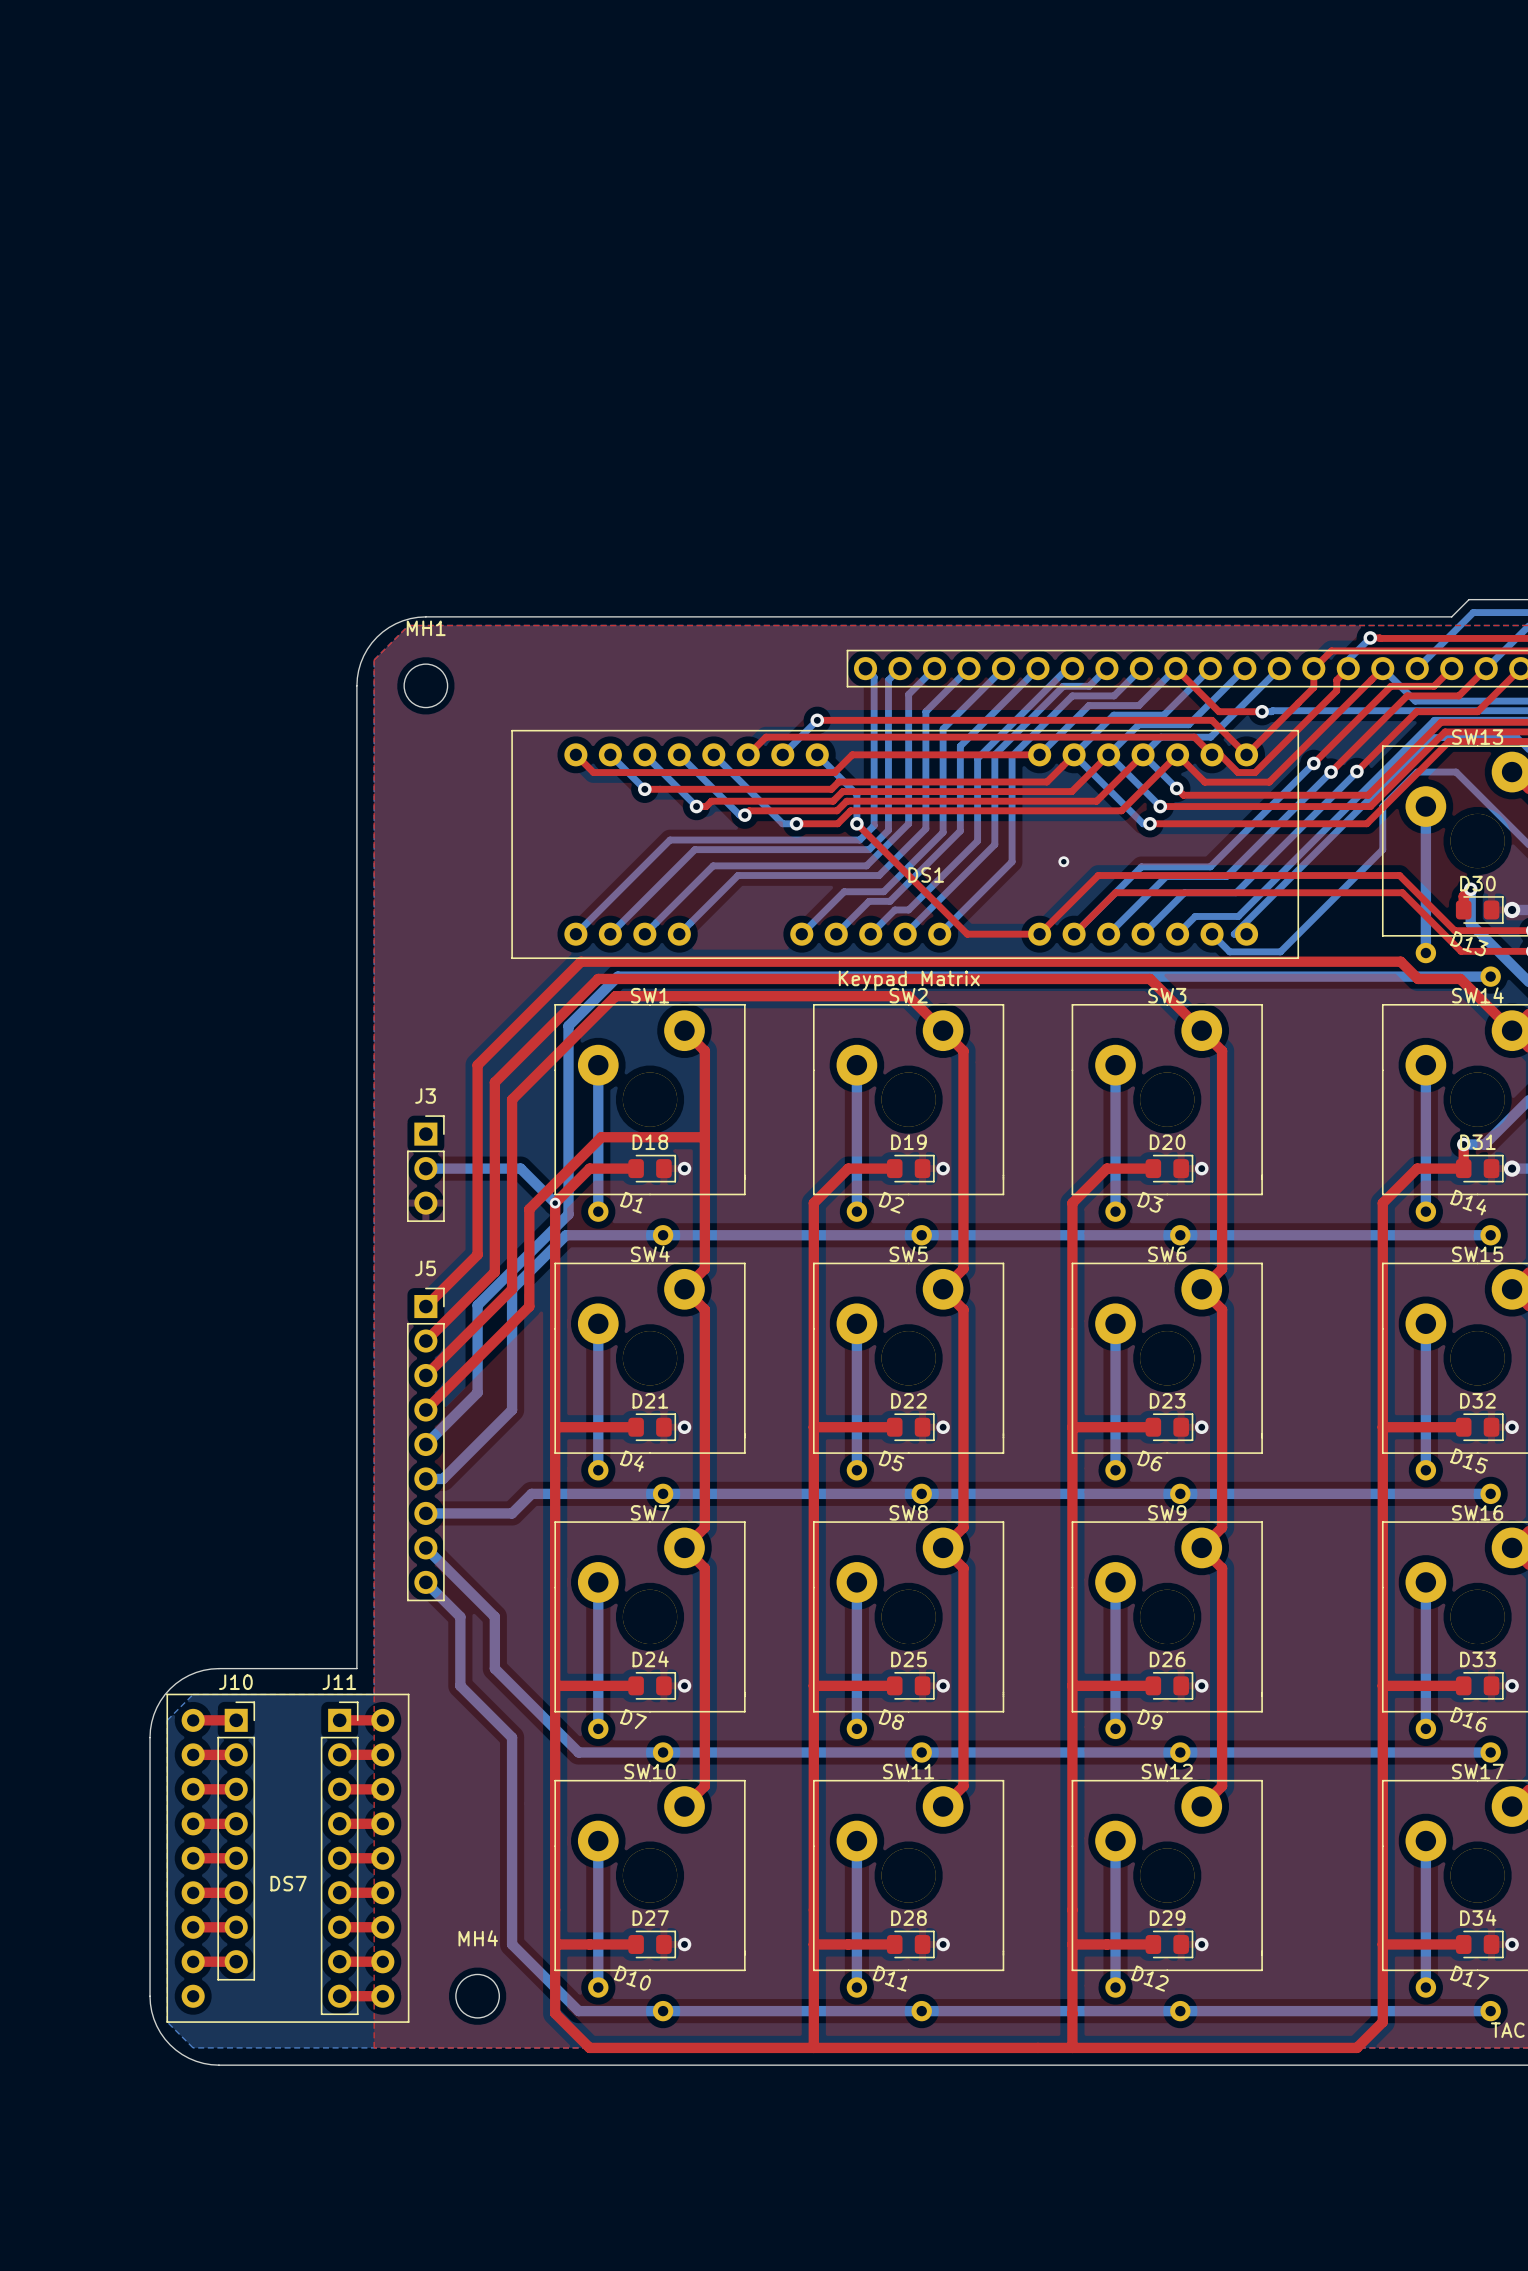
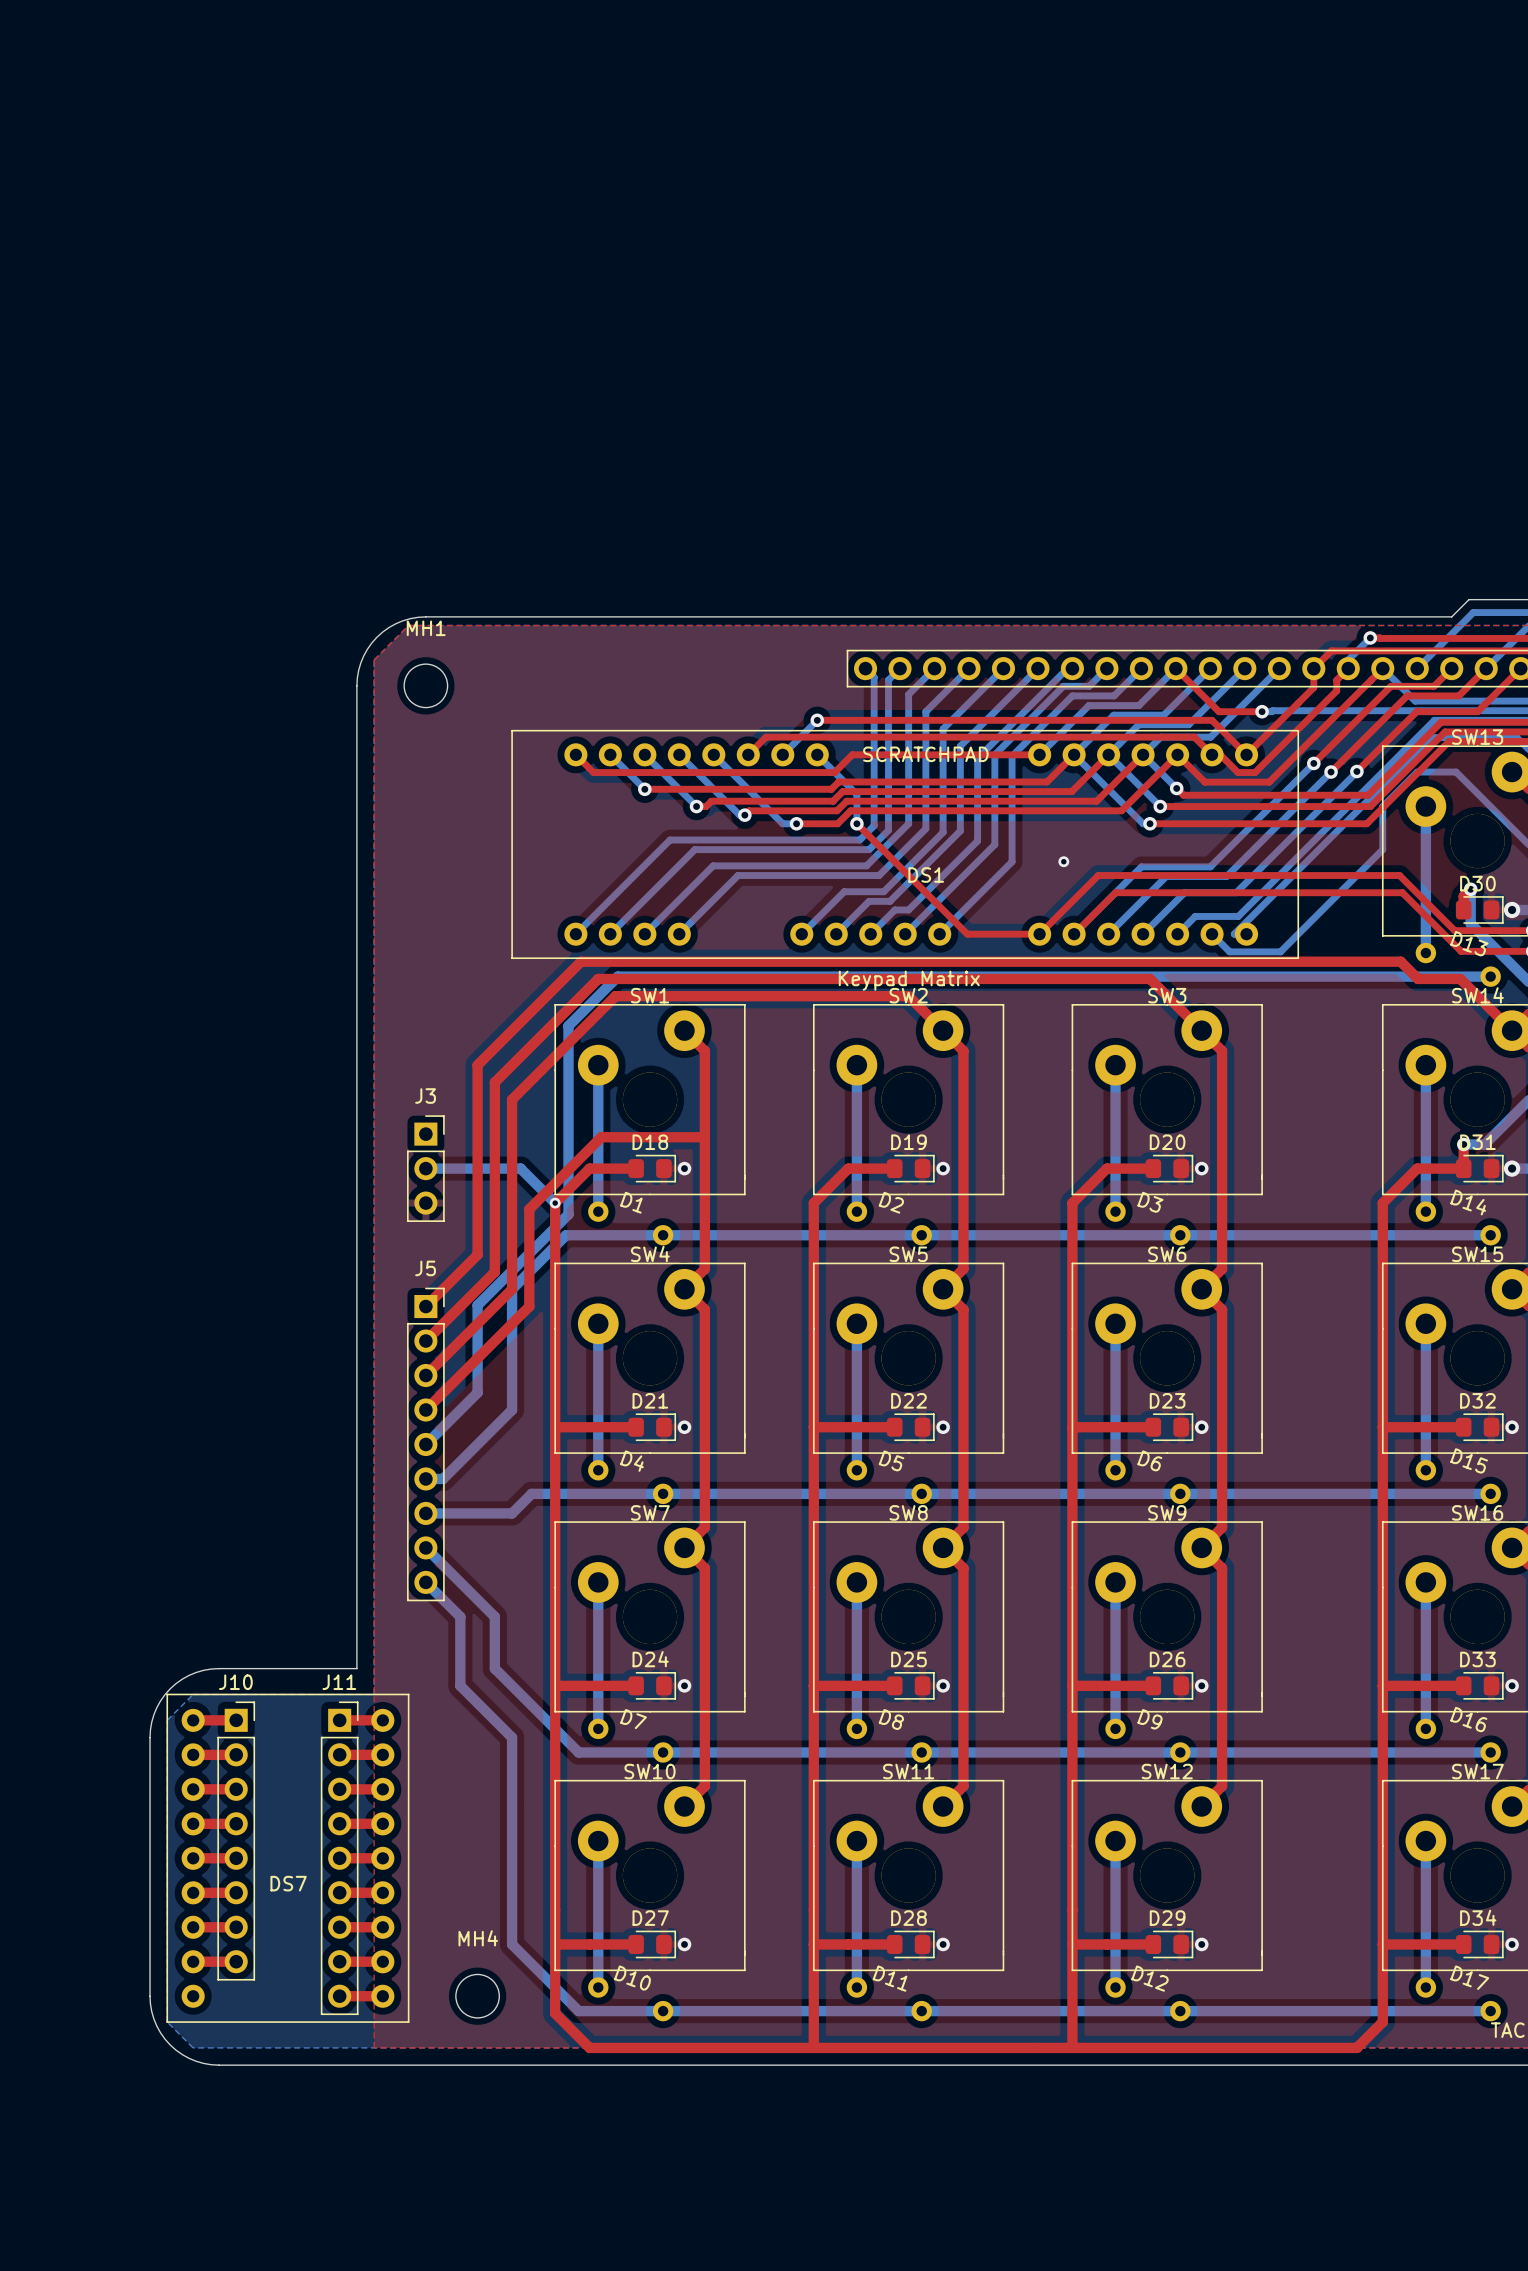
text: none -> SCRATCHPAD (925, 754)

